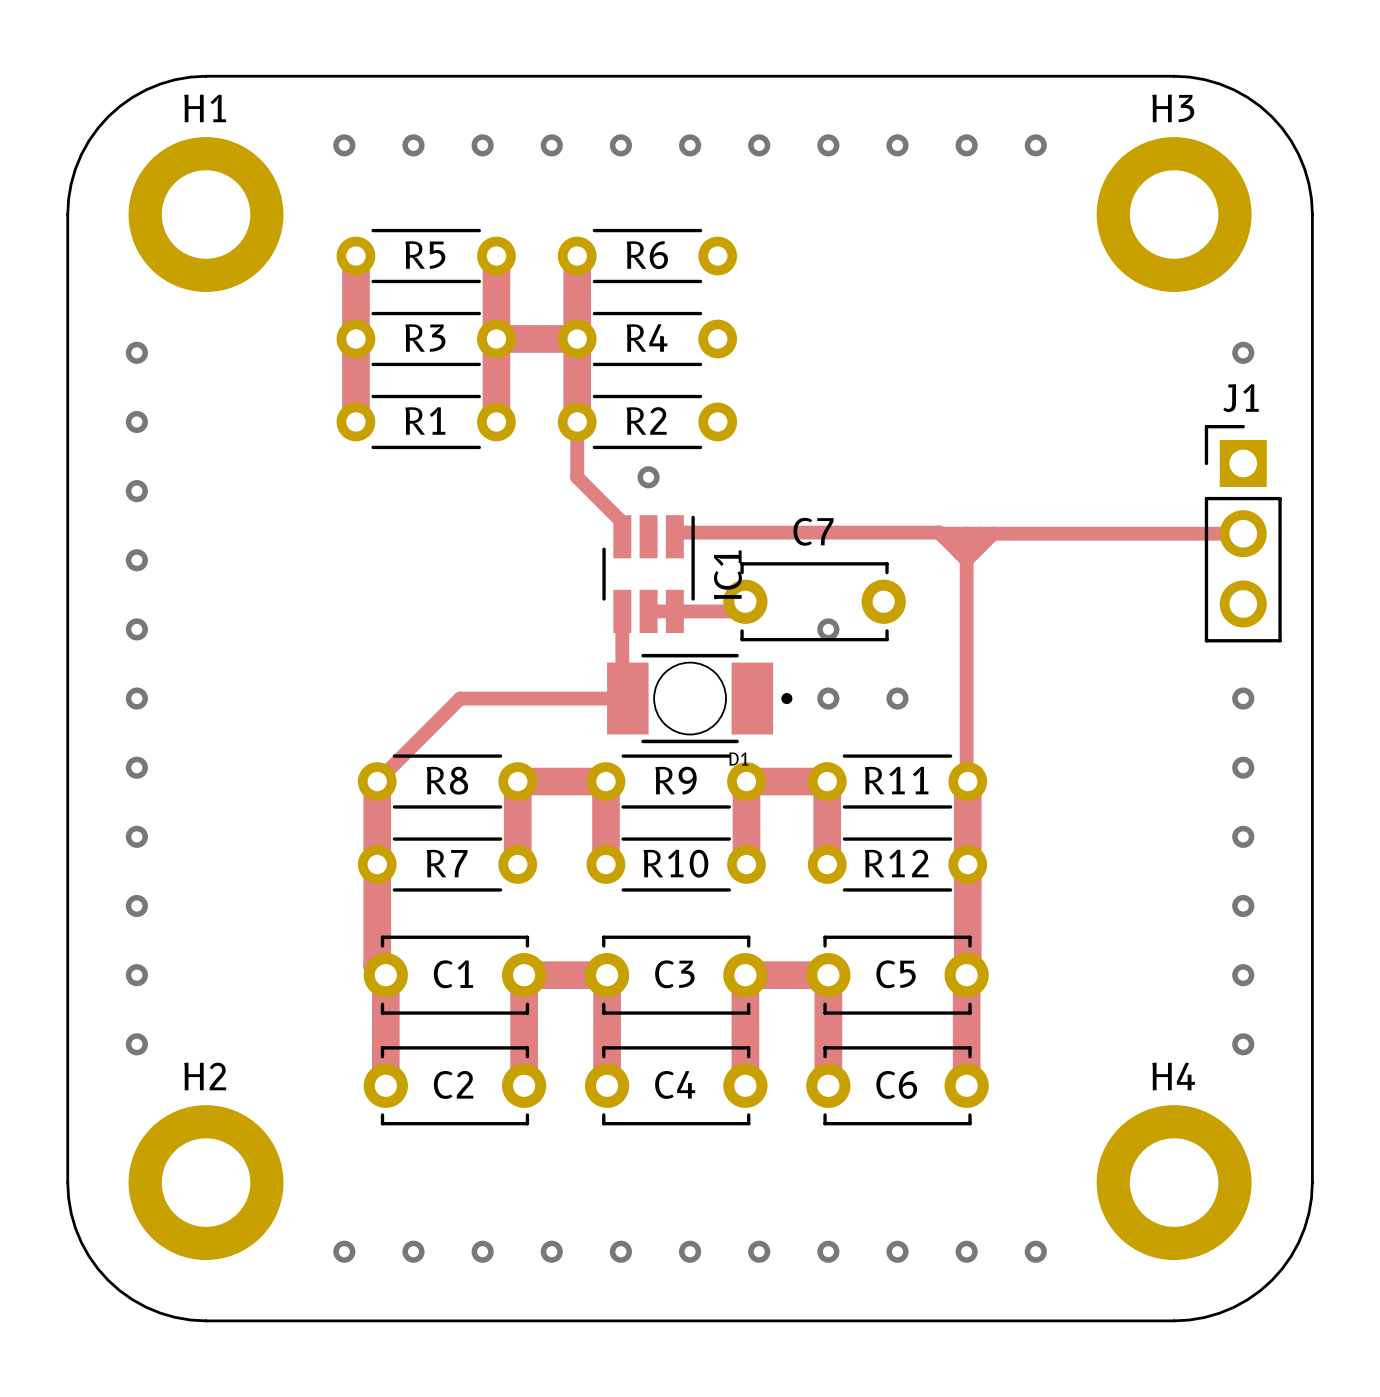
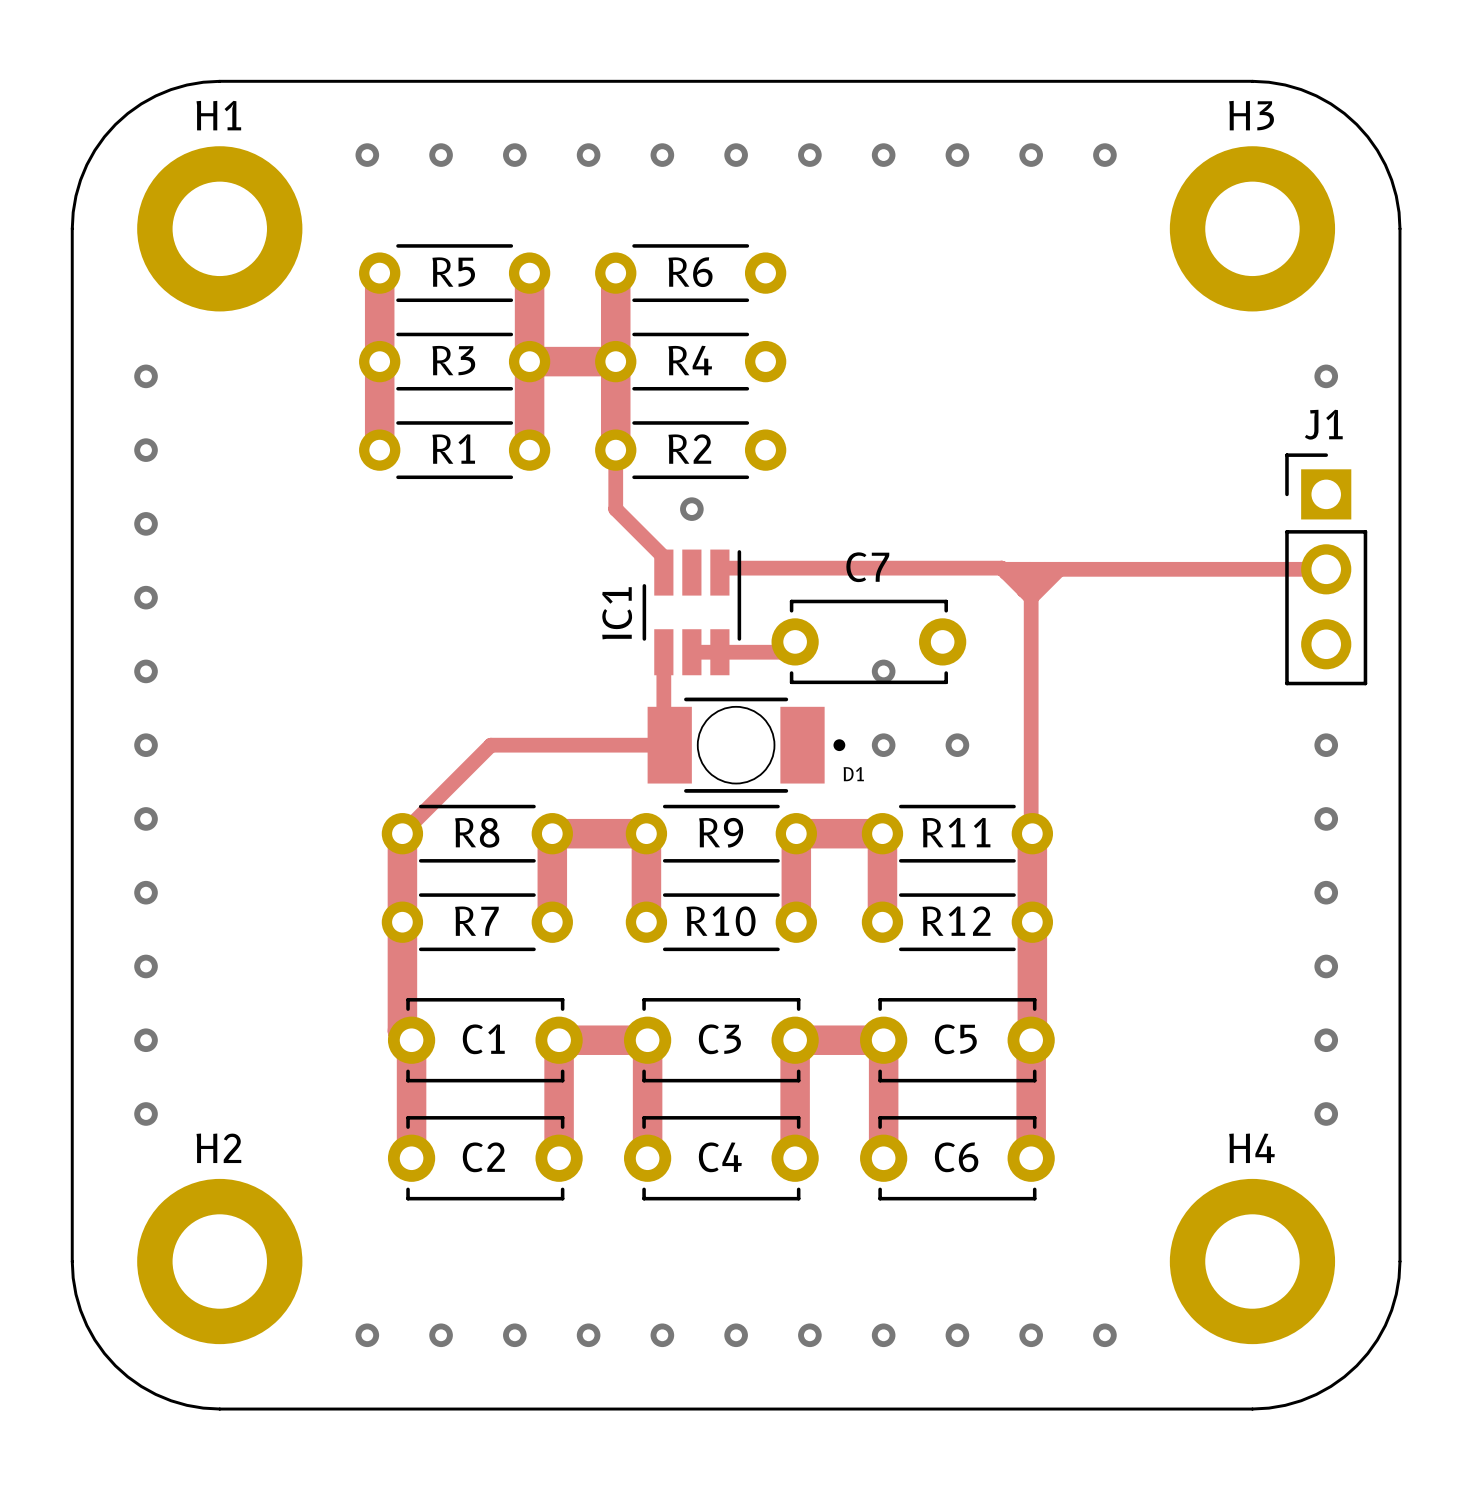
IC1 name position: IC1 (727, 574) -> IC1 (617, 613)
D1 name position: D1 (738, 759) -> D1 (853, 774)

